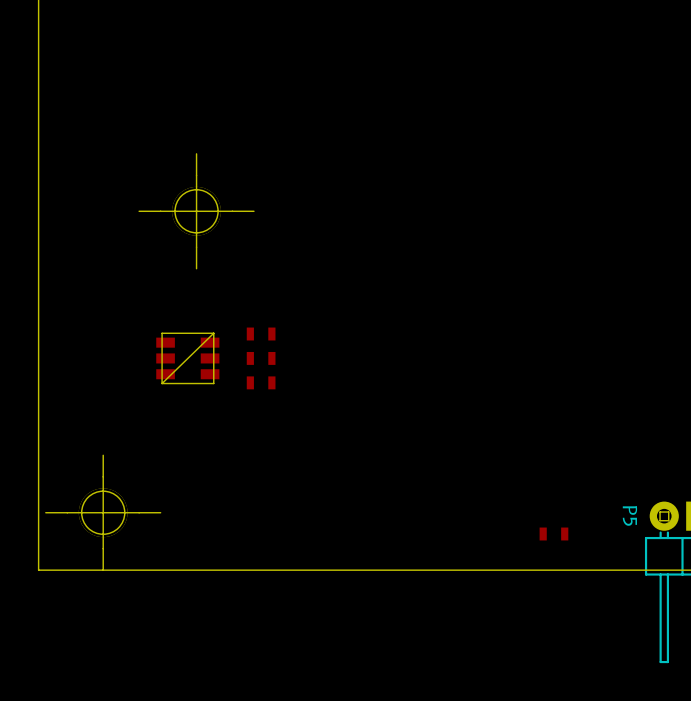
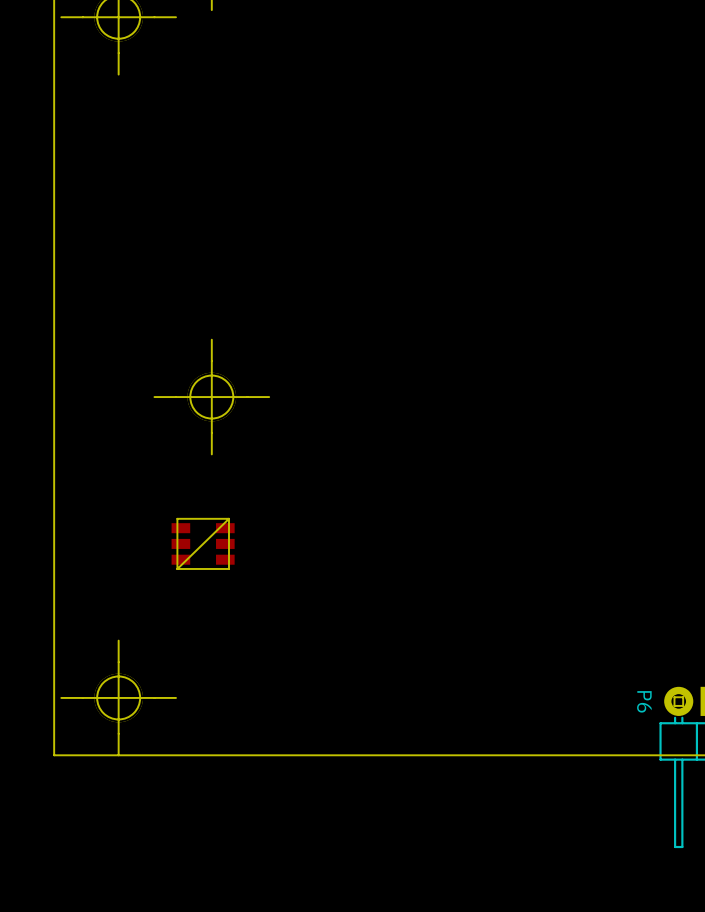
part: (261, 334) -> none
part: (261, 358) -> none
part: (261, 382) -> none
P5 name: P5 (629, 515) -> P6 (644, 701)
part: (553, 534) -> none

